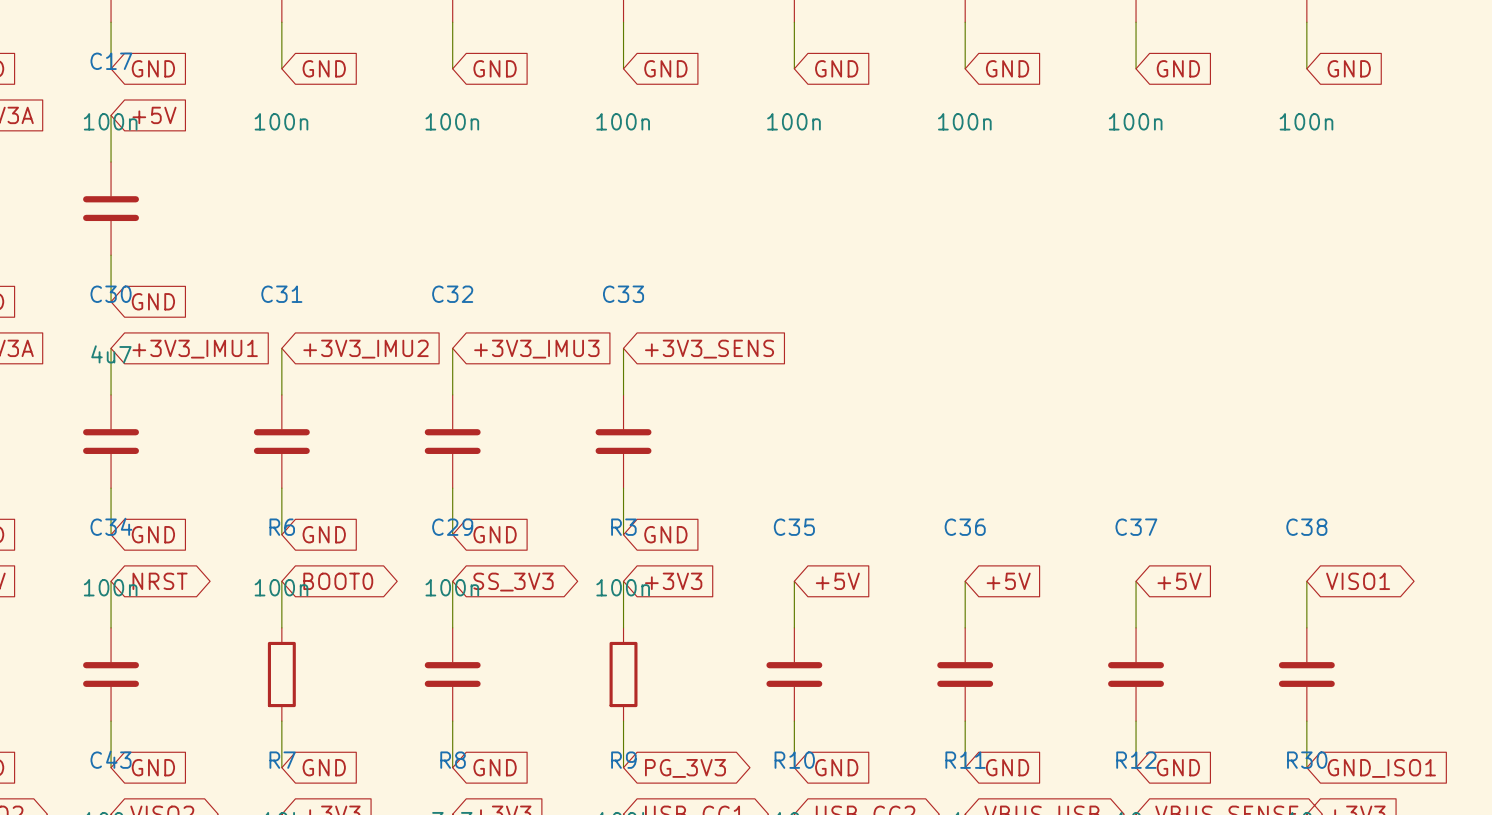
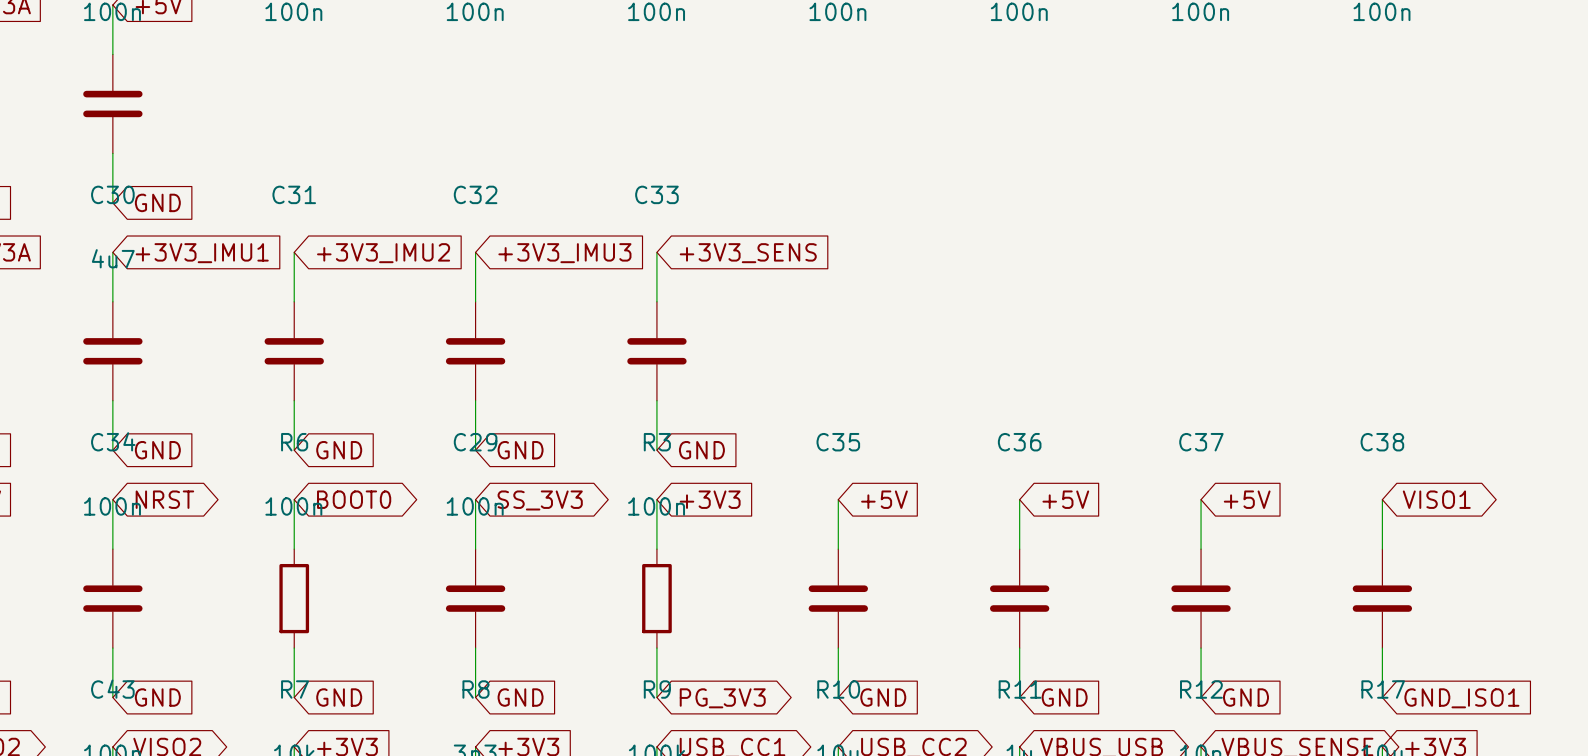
R30 name: R30 (1307, 760) -> R17 (1383, 689)

